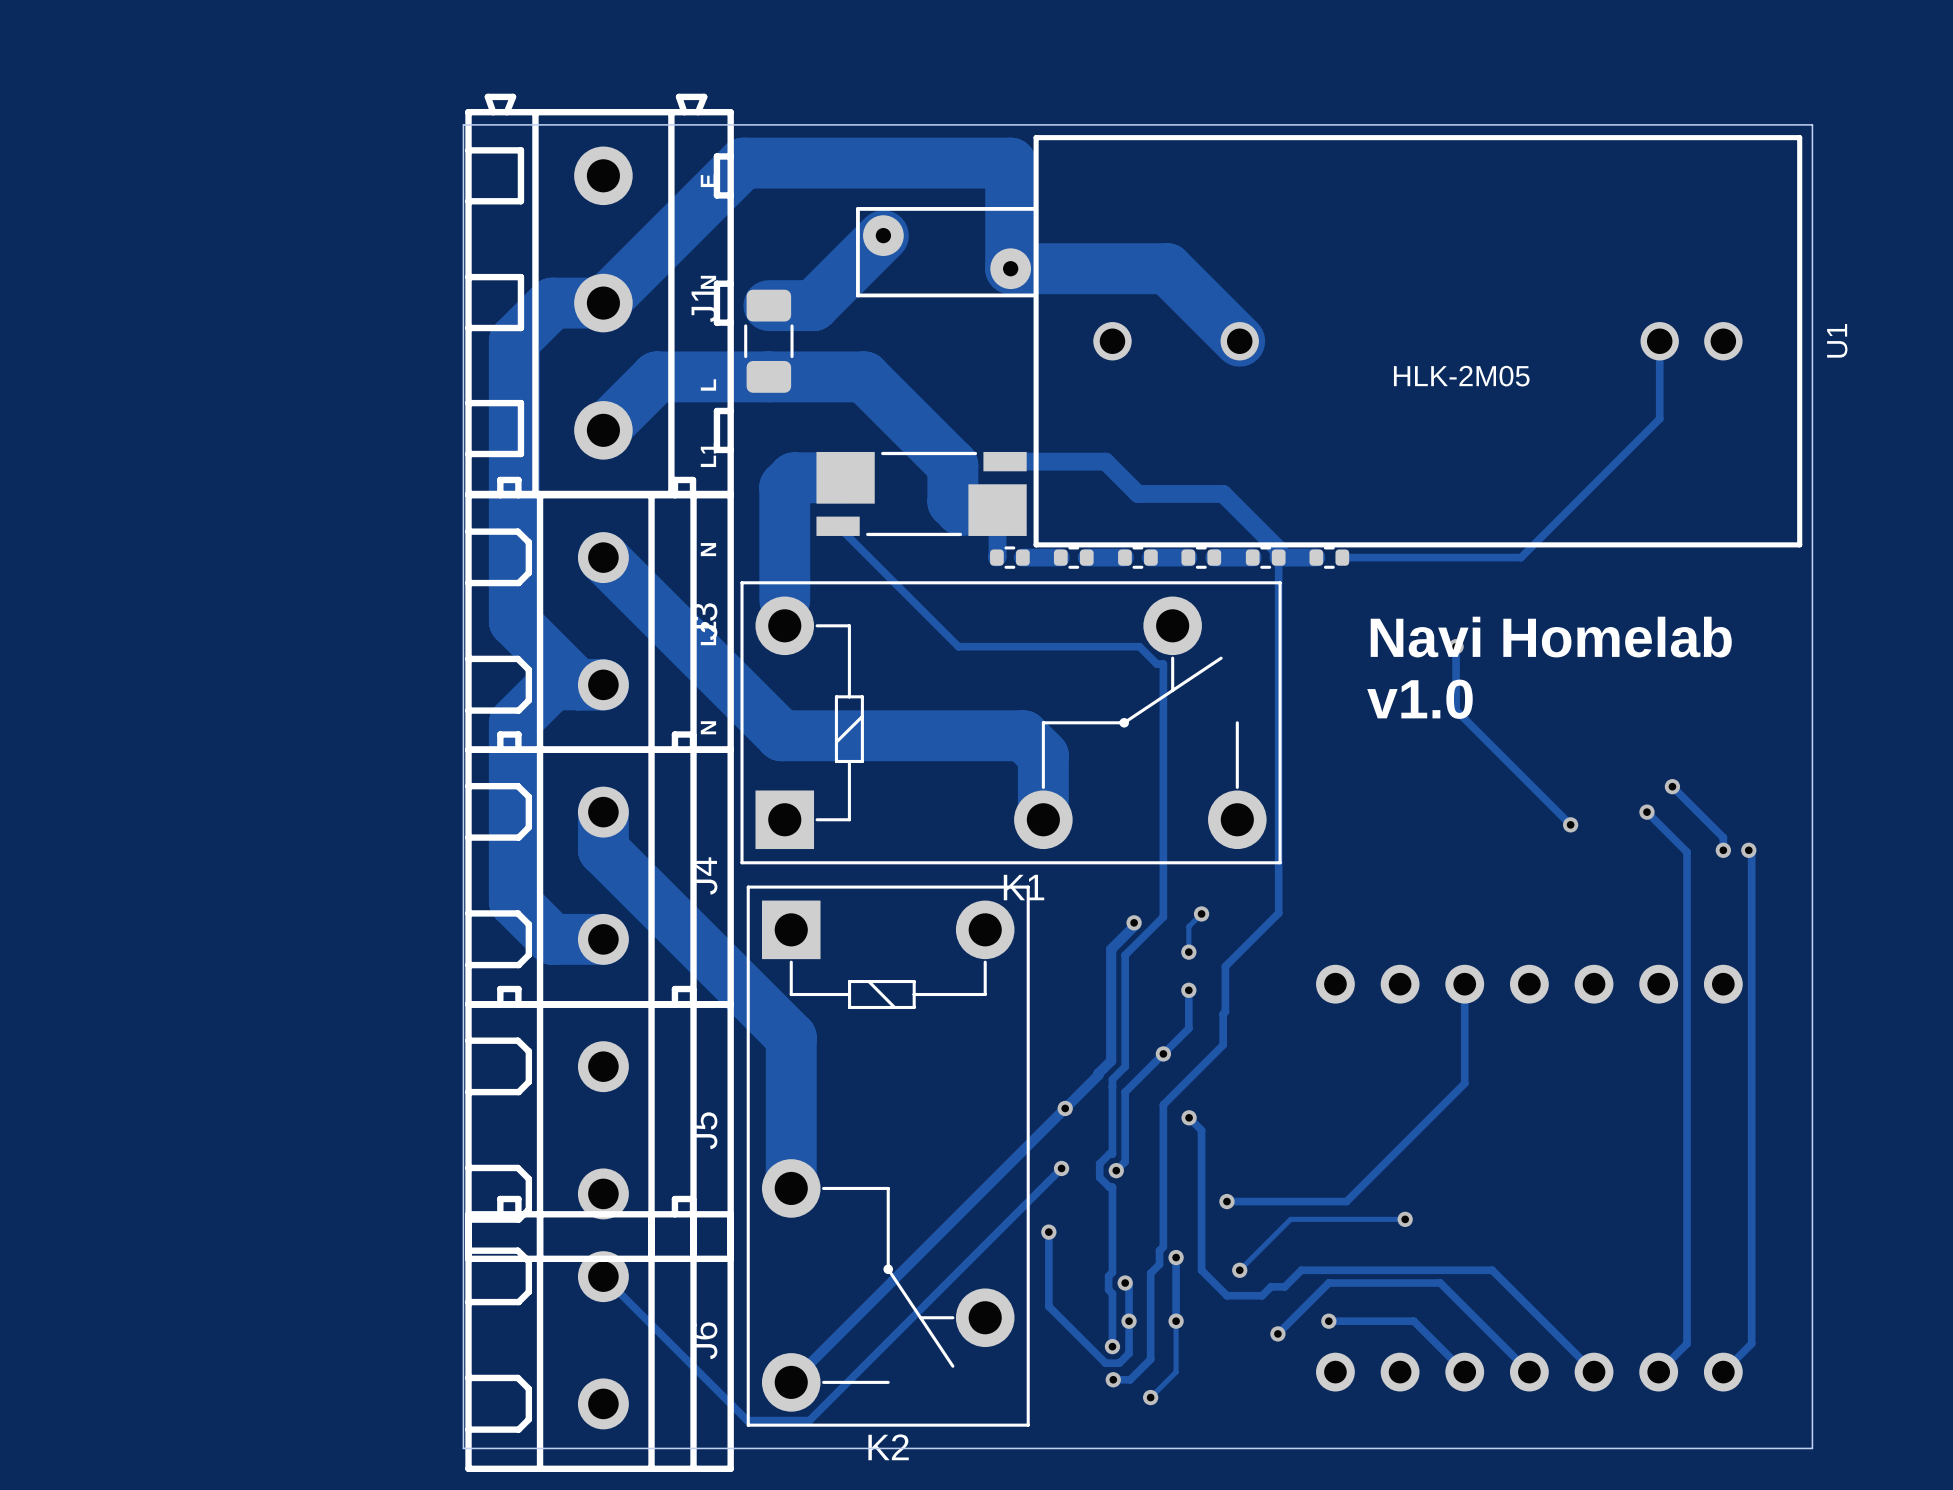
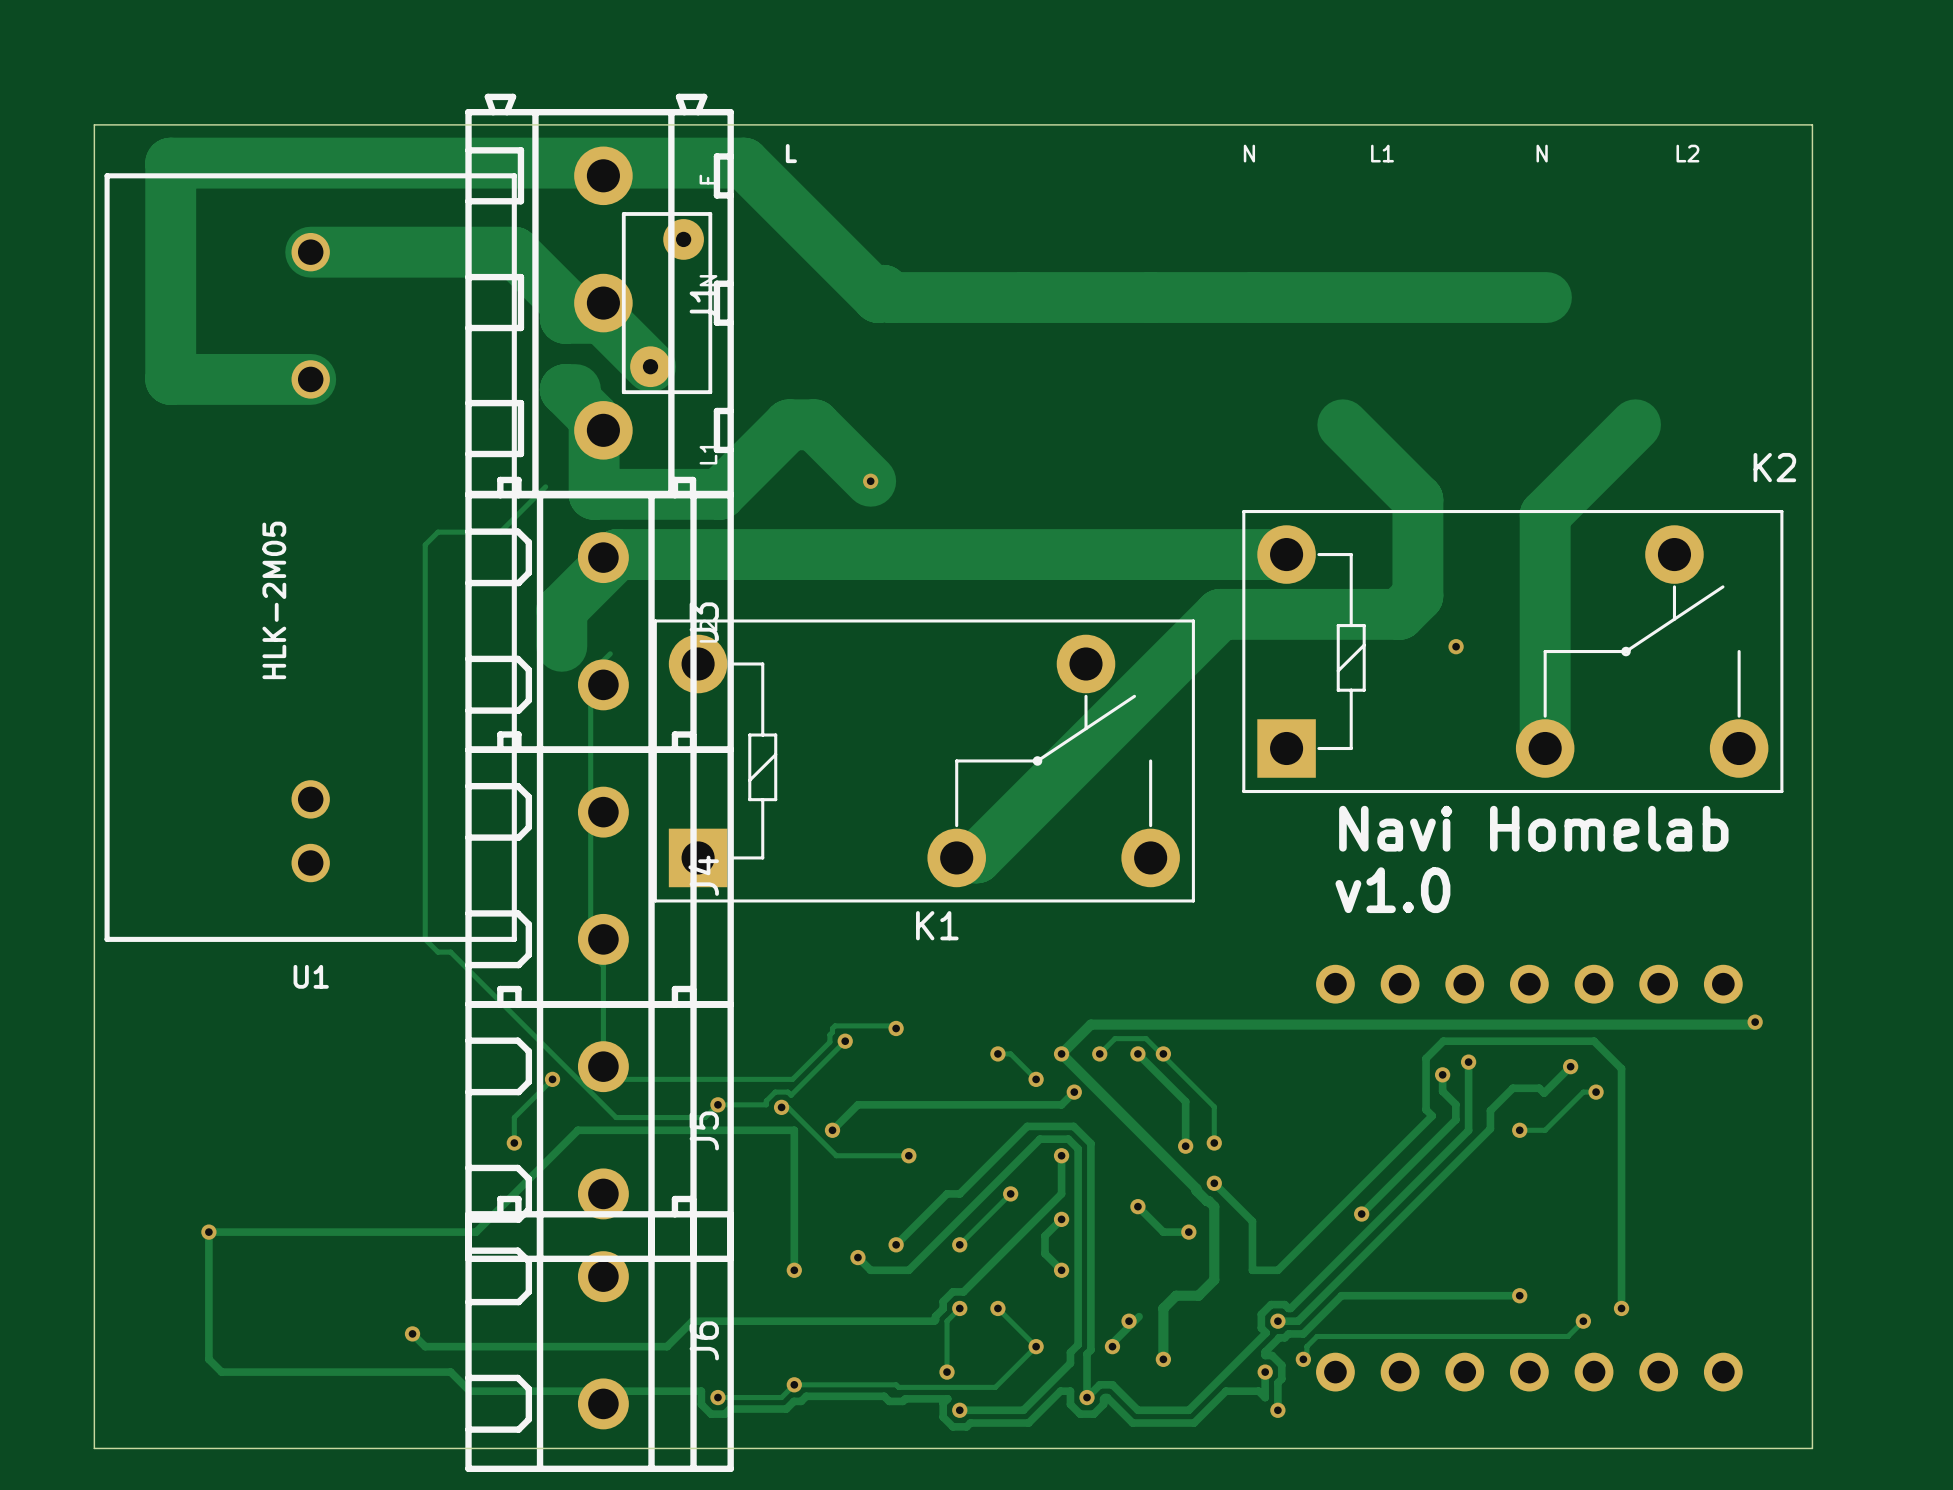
board edge: (463, 124) (463, 1448) -> (463, 124) (94, 124) (94, 1448) (463, 1448)
text: none -> N (1249, 153)
text: none -> L1 (1382, 153)
text: none -> N (1542, 153)
text: none -> L2 (1687, 153)
track: (743, 163) (1010, 163) (1010, 268) (1167, 268) (1239, 341) -> (743, 163) (878, 297) (883, 290) (890, 297) (1546, 297)
track: (743, 163) (603, 303) (552, 303) (514, 341) (514, 621) (577, 684) -> (743, 163) (170, 163) (170, 379) (310, 379)
track: (883, 235) (813, 305) (768, 305) -> none
track: none -> (322, 240) (310, 252) (514, 252) (565, 303) (565, 318) (602, 318) (650, 366)
part rotation: 0° (947, 252) -> 90° clockwise (667, 303)
part position: (947, 252) -> (667, 303)
part: (768, 341) -> none
U1 rotation: 0° (1417, 341) -> 90° clockwise (310, 557)
U1 position: (1417, 341) -> (310, 557)
track: (1659, 341) (1659, 418) (1521, 557) (1342, 557) -> none
text rotation: 0° (708, 384) -> 90° clockwise (791, 153)
text position: L (708, 384) -> L (791, 153)
track: none -> (575, 389) (565, 389) (594, 418) (594, 494) (719, 494) (789, 424) (814, 424) (870, 481)
track: none -> (1342, 424) (1417, 499) (1417, 595) (1399, 614) (1220, 614) (976, 857) (956, 857)
track: none -> (1635, 424) (1545, 515) (1545, 748)
track: (603, 430) (656, 376) (864, 376) (952, 465) (952, 501) (961, 510) (997, 510) (996, 557) -> none
track: (1005, 461) (1105, 461) (1137, 493) (1223, 493) (1278, 549) (1278, 557) -> none
track: (845, 477) (794, 477) (784, 487) (784, 600) -> none
via: none -> (870, 481)
track: none -> (545, 486) (500, 532) (437, 532) (425, 544) (425, 939) (437, 952) (450, 952) (616, 1117) (705, 1117) (717, 1104) (766, 1104) (766, 1101) (775, 1092) (787, 1092) (791, 1095) (845, 1041)
part: (921, 493) -> none
track: (838, 526) (958, 646) (1139, 646) (1156, 664) (1163, 664) (1163, 916) (1125, 955) (1125, 1066) (1112, 1079) (1112, 1154) (1109, 1154) (1099, 1163) (1099, 1177) (1109, 1187) (1112, 1187) (1112, 1272) (1108, 1276) (1108, 1289) (1112, 1293) (1112, 1343) -> (1139, 1316) (1112, 1343)
text: N (708, 549) -> none
track: none -> (1286, 554) (617, 554) (561, 609) (561, 646)
track: (603, 557) (781, 735) (1023, 735) (1043, 755) (1043, 819) -> none
part: (1009, 557) -> none
part: (1073, 557) -> none
part: (1137, 557) -> none
part: (1201, 557) -> none
part: (1265, 557) -> none
track: (1278, 557) (1278, 913) (1225, 966) (1223, 1045) (1163, 1104) (1163, 1246) (1159, 1250) (1159, 1264) (1150, 1273) (1150, 1359) (1130, 1379) (1113, 1379) -> none
track: (1278, 557) (1316, 557) -> none
part: (1329, 557) -> none
text position: Navi Homelab (1551, 637) -> Navi Homelab (1533, 828)
track: (1456, 646) (1456, 710) (1570, 824) -> none
track: none -> (610, 653) (595, 668) (595, 683) (590, 683) (590, 953) (603, 965) (603, 1079) (792, 1079) (829, 1042) (829, 1034) (835, 1025) (893, 1025) (896, 1028)
track: (603, 684) (552, 684) (514, 723) (514, 901) (552, 939) (603, 939) -> none
text position: v1.0 (1419, 699) -> v1.0 (1392, 890)
K1 position: (1011, 722) -> (924, 760)
text: N (708, 727) -> none
track: (1672, 786) (1723, 837) (1723, 850) -> none
via: (1672, 786) -> none
track: (603, 812) (603, 849) (791, 1037) (791, 1188) -> none
track: (1646, 812) (1687, 852) (1687, 1343) (1658, 1372) -> none
via: (1646, 812) -> none
via: (1570, 824) -> none
via: (1723, 850) -> none
track: (1748, 850) (1751, 853) (1751, 1343) (1723, 1372) -> none
via: (1748, 850) -> none
track: (1201, 913) (1188, 926) (1188, 952) -> none
via: (1201, 913) -> none
track: (1134, 922) (1134, 926) (1111, 949) (1111, 1060) (791, 1382) -> none
via: (1134, 922) -> none
via: (1188, 952) -> none
track: (1464, 984) (1464, 1083) (1432, 1115) -> (1621, 1308) (1621, 1068) (1594, 1041) (1443, 1041) (1426, 1058) (1426, 1109) (1432, 1115)
track: (1188, 990) (1188, 1028) (1125, 1092) (1125, 1161) (1116, 1170) -> none
via: (1188, 990) -> none
track: none -> (1755, 1022) (1752, 1024) (1090, 1024) (1061, 1053) (1214, 1206) (1214, 1279) (1198, 1295) (1176, 1295) (1163, 1308) (1163, 1359)
via: none -> (1755, 1022)
via: none -> (896, 1028)
via: none -> (845, 1041)
track: none -> (997, 1053) (1010, 1053) (1036, 1079)
via: none -> (997, 1053)
via: none -> (1061, 1053)
track: none -> (1099, 1053) (1115, 1038) (1146, 1038) (1214, 1106) (1214, 1143)
via: none -> (1099, 1053)
track: none -> (1137, 1053) (1185, 1101) (1185, 1146)
via: none -> (1137, 1053)
track: none -> (1468, 1062) (1468, 1130) (1290, 1308) (1284, 1304) (1271, 1304) (1261, 1314) (1261, 1328) (1266, 1332) (1188, 1410) (1137, 1410) (1112, 1384) (1099, 1384) (1087, 1397) (1087, 1353) (1090, 1350) (1090, 1143) (1073, 1126) (1027, 1126) (959, 1193) (947, 1193) (896, 1244)
via: none -> (1468, 1062)
track: none -> (1570, 1066) (1544, 1093) (1539, 1088) (1512, 1088) (1490, 1110) (1490, 1128) (1298, 1321) (1277, 1321)
via: none -> (1570, 1066)
track: none -> (1442, 1074) (1442, 1091) (1455, 1104) (1455, 1119) (1361, 1214)
via: none -> (1442, 1074)
track: none -> (552, 1079) (514, 1117) (514, 1143)
via: none -> (552, 1079)
via: none -> (1036, 1079)
track: none -> (1074, 1092) (1061, 1104) (857, 1104) (832, 1130)
track: none -> (1596, 1092) (1583, 1092) (1545, 1130) (1519, 1130)
via: none -> (1596, 1092)
via: none -> (717, 1104)
track: none -> (785, 1104) (781, 1107) (787, 1107) (836, 1155) (908, 1155)
via: none -> (781, 1107)
via position: (1065, 1108) -> (1074, 1092)
track: (1189, 1117) (1201, 1130) (1201, 1270) (1227, 1295) (1262, 1295) (1271, 1286) (1284, 1286) (1301, 1270) (1492, 1270) (1594, 1372) -> none
via: (1189, 1117) -> none
via: none -> (832, 1130)
via: none -> (1519, 1130)
via: none -> (514, 1143)
via: none -> (1214, 1143)
via: none -> (1185, 1146)
via: none -> (908, 1155)
track: none -> (1061, 1155) (1061, 1193) (963, 1291) (952, 1291) (943, 1301) (943, 1308) (935, 1316) (934, 1321) (692, 1321) (667, 1346) (425, 1346) (412, 1333)
K2 rotation: 0° (888, 1156) -> 90° counterclockwise (1512, 651)
K2 position: (888, 1156) -> (1512, 651)
track: (1061, 1168) (809, 1420) (747, 1420) (603, 1276) -> none
via position: (1061, 1168) -> (1061, 1155)
via: (1116, 1170) -> none
track: none -> (1010, 1193) (959, 1244)
via: none -> (1010, 1193)
track: (1226, 1201) (1346, 1201) -> (1214, 1183) (1252, 1221) (1252, 1270) (1277, 1270) (1346, 1201)
via position: (1226, 1201) -> (1214, 1183)
track: none -> (1137, 1206) (1163, 1232) (1188, 1232)
via: none -> (1137, 1206)
track: none -> (1061, 1219) (1045, 1235) (1045, 1253) (1061, 1270)
track: (1405, 1219) (1290, 1219) (1239, 1270) -> none
via position: (1405, 1219) -> (1361, 1214)
via: none -> (208, 1232)
track: (1048, 1232) (1048, 1306) (1105, 1363) (1119, 1363) (1129, 1353) (1129, 1286) (1125, 1283) -> none
via position: (1048, 1232) -> (1061, 1219)
via: none -> (1188, 1232)
via: none -> (896, 1244)
via: none -> (959, 1244)
track: none -> (857, 1257) (870, 1270) (908, 1270) (1039, 1139) (1068, 1139) (1078, 1148) (1078, 1344) (1070, 1352) (1070, 1363) (1023, 1410) (959, 1410)
via: none -> (857, 1257)
track: (1176, 1257) (1176, 1372) (1150, 1397) -> none
via: (1176, 1257) -> none
track: none -> (794, 1270) (794, 1130) (577, 1130) (476, 1232) (208, 1232) (208, 1359) (221, 1372) (450, 1372) (469, 1391) (701, 1391) (701, 1404) (711, 1414) (724, 1414) (729, 1409) (786, 1409) (793, 1401) (801, 1401) (806, 1396) (884, 1396) (889, 1401) (902, 1401) (905, 1398) (947, 1398) (943, 1403) (943, 1417) (952, 1426) (966, 1426) (970, 1423) (1028, 1423) (1060, 1391) (1070, 1391) (1070, 1404) (1080, 1414) (1093, 1414) (1103, 1404) (1103, 1399) (1107, 1397) (1132, 1423) (1194, 1423) (1225, 1391) (1258, 1391) (1265, 1397) (1265, 1372)
via: none -> (794, 1270)
via: none -> (1061, 1270)
via: (1239, 1270) -> none
via: (1125, 1283) -> none
track: none -> (1519, 1295) (1341, 1295) (1303, 1333) (1288, 1333) (1284, 1337) (1278, 1337)
via: none -> (1519, 1295)
track: none -> (959, 1308) (947, 1321) (947, 1372)
via: none -> (959, 1308)
track: none -> (997, 1308) (1036, 1346) (995, 1387) (794, 1384) (781, 1397) (717, 1397)
via: none -> (997, 1308)
via: none -> (1621, 1308)
via: (1176, 1321) -> none
track: (1328, 1321) (1413, 1321) (1464, 1372) -> none
via: (1328, 1321) -> none
track: none -> (1583, 1321) (1568, 1336) (1317, 1336) (1306, 1346) (1306, 1355) (1303, 1359)
via: none -> (1583, 1321)
via: none -> (412, 1333)
track: (1277, 1333) (1328, 1283) (1440, 1283) (1529, 1372) -> none
via position: (1277, 1333) -> (1277, 1321)
track: none -> (1278, 1338) (1265, 1351) (1265, 1355) (1272, 1355) (1281, 1365) (1281, 1378) (1277, 1382) (1277, 1410)
via: none -> (1036, 1346)
via: none -> (1163, 1359)
via: none -> (1303, 1359)
via: none -> (947, 1372)
via: none -> (1265, 1372)
via: (1113, 1379) -> none
via: none -> (794, 1384)
via: none -> (717, 1397)
via: none -> (1087, 1397)
via: (1150, 1397) -> none
via: none -> (959, 1410)
via: none -> (1277, 1410)
K2 name position: K2 (888, 1447) -> K2 (1774, 467)

